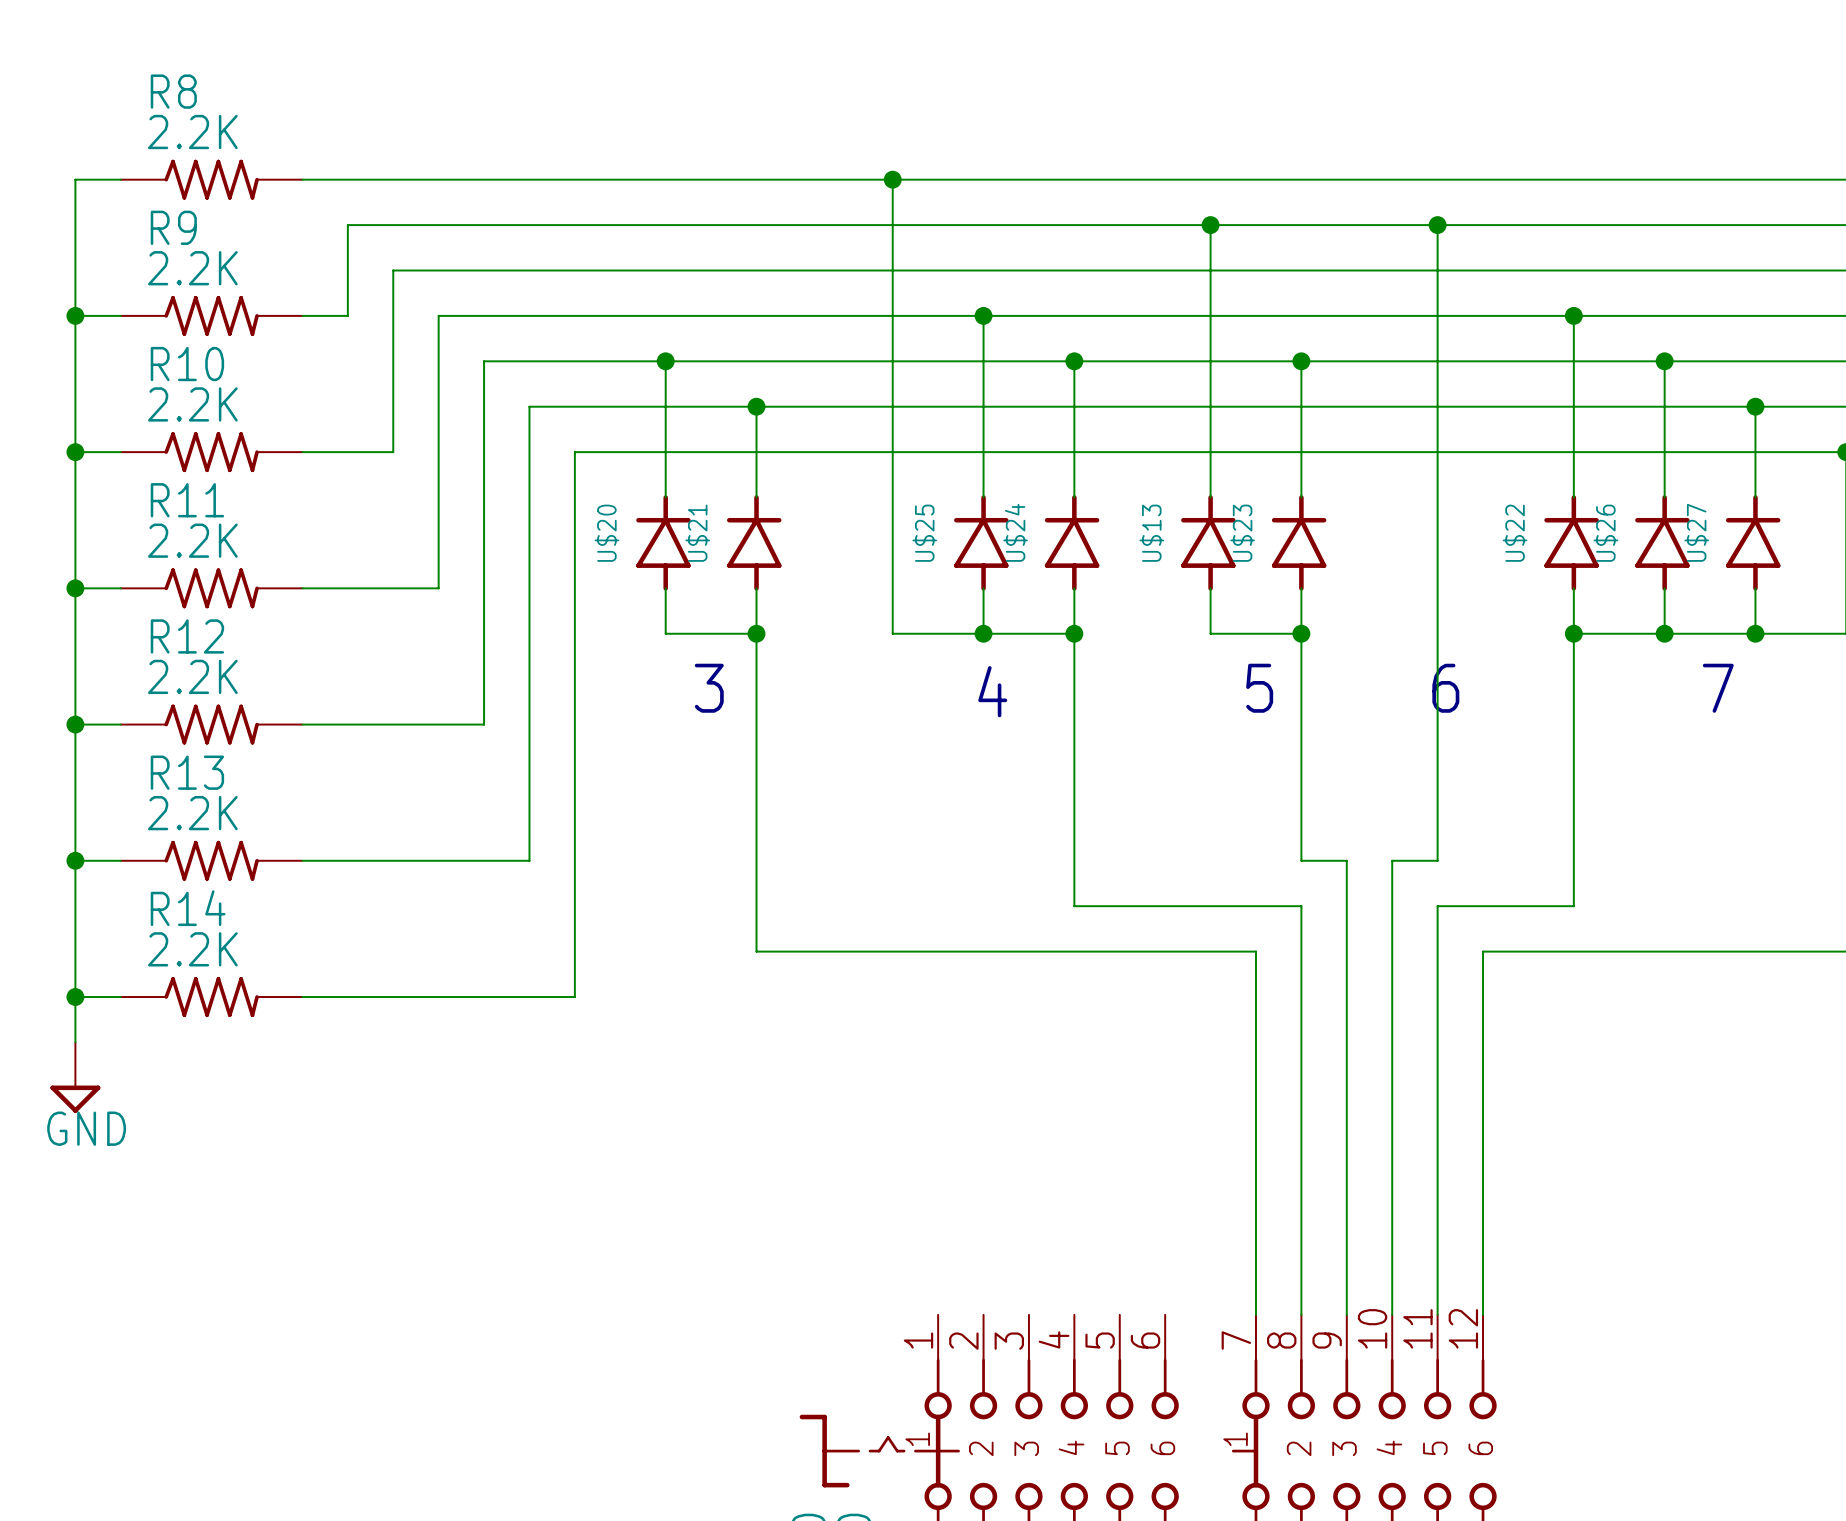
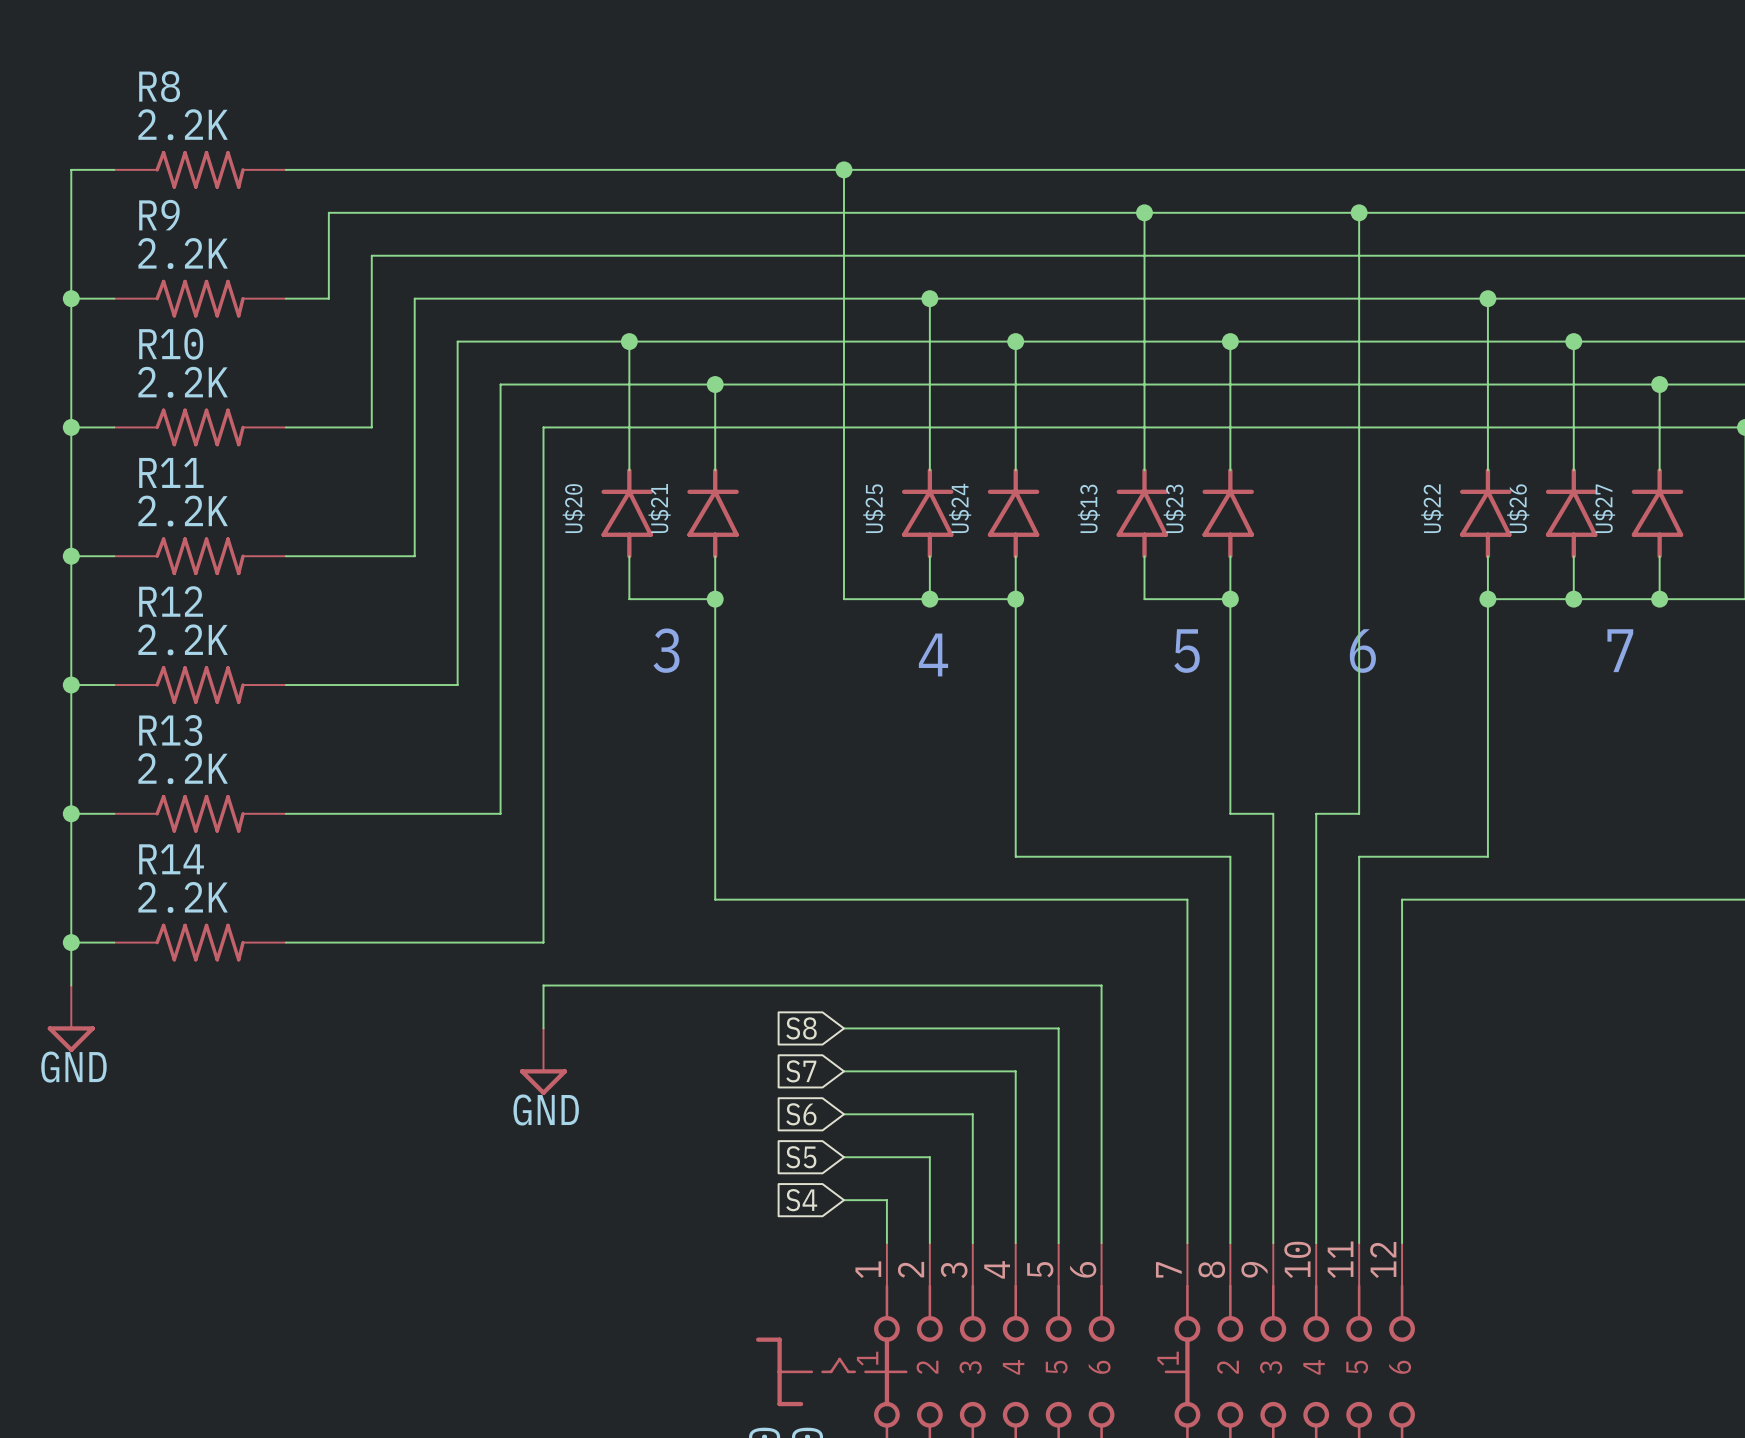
wire: none -> (543, 1028) (543, 985) (1101, 985) (1101, 1243)
global label: none -> S8 (801, 1028)
wire: none -> (844, 1028) (1058, 1028) (1058, 1243)
power symbol: none -> GND (543, 1061)
global label: none -> S7 (801, 1071)
wire: none -> (844, 1071) (1015, 1071) (1015, 1243)
global label: none -> S6 (801, 1114)
wire: none -> (844, 1114) (972, 1114) (972, 1243)
global label: none -> S5 (801, 1157)
wire: none -> (844, 1157) (929, 1157) (929, 1243)
global label: none -> S4 (801, 1200)
wire: none -> (844, 1200) (886, 1200) (886, 1243)

